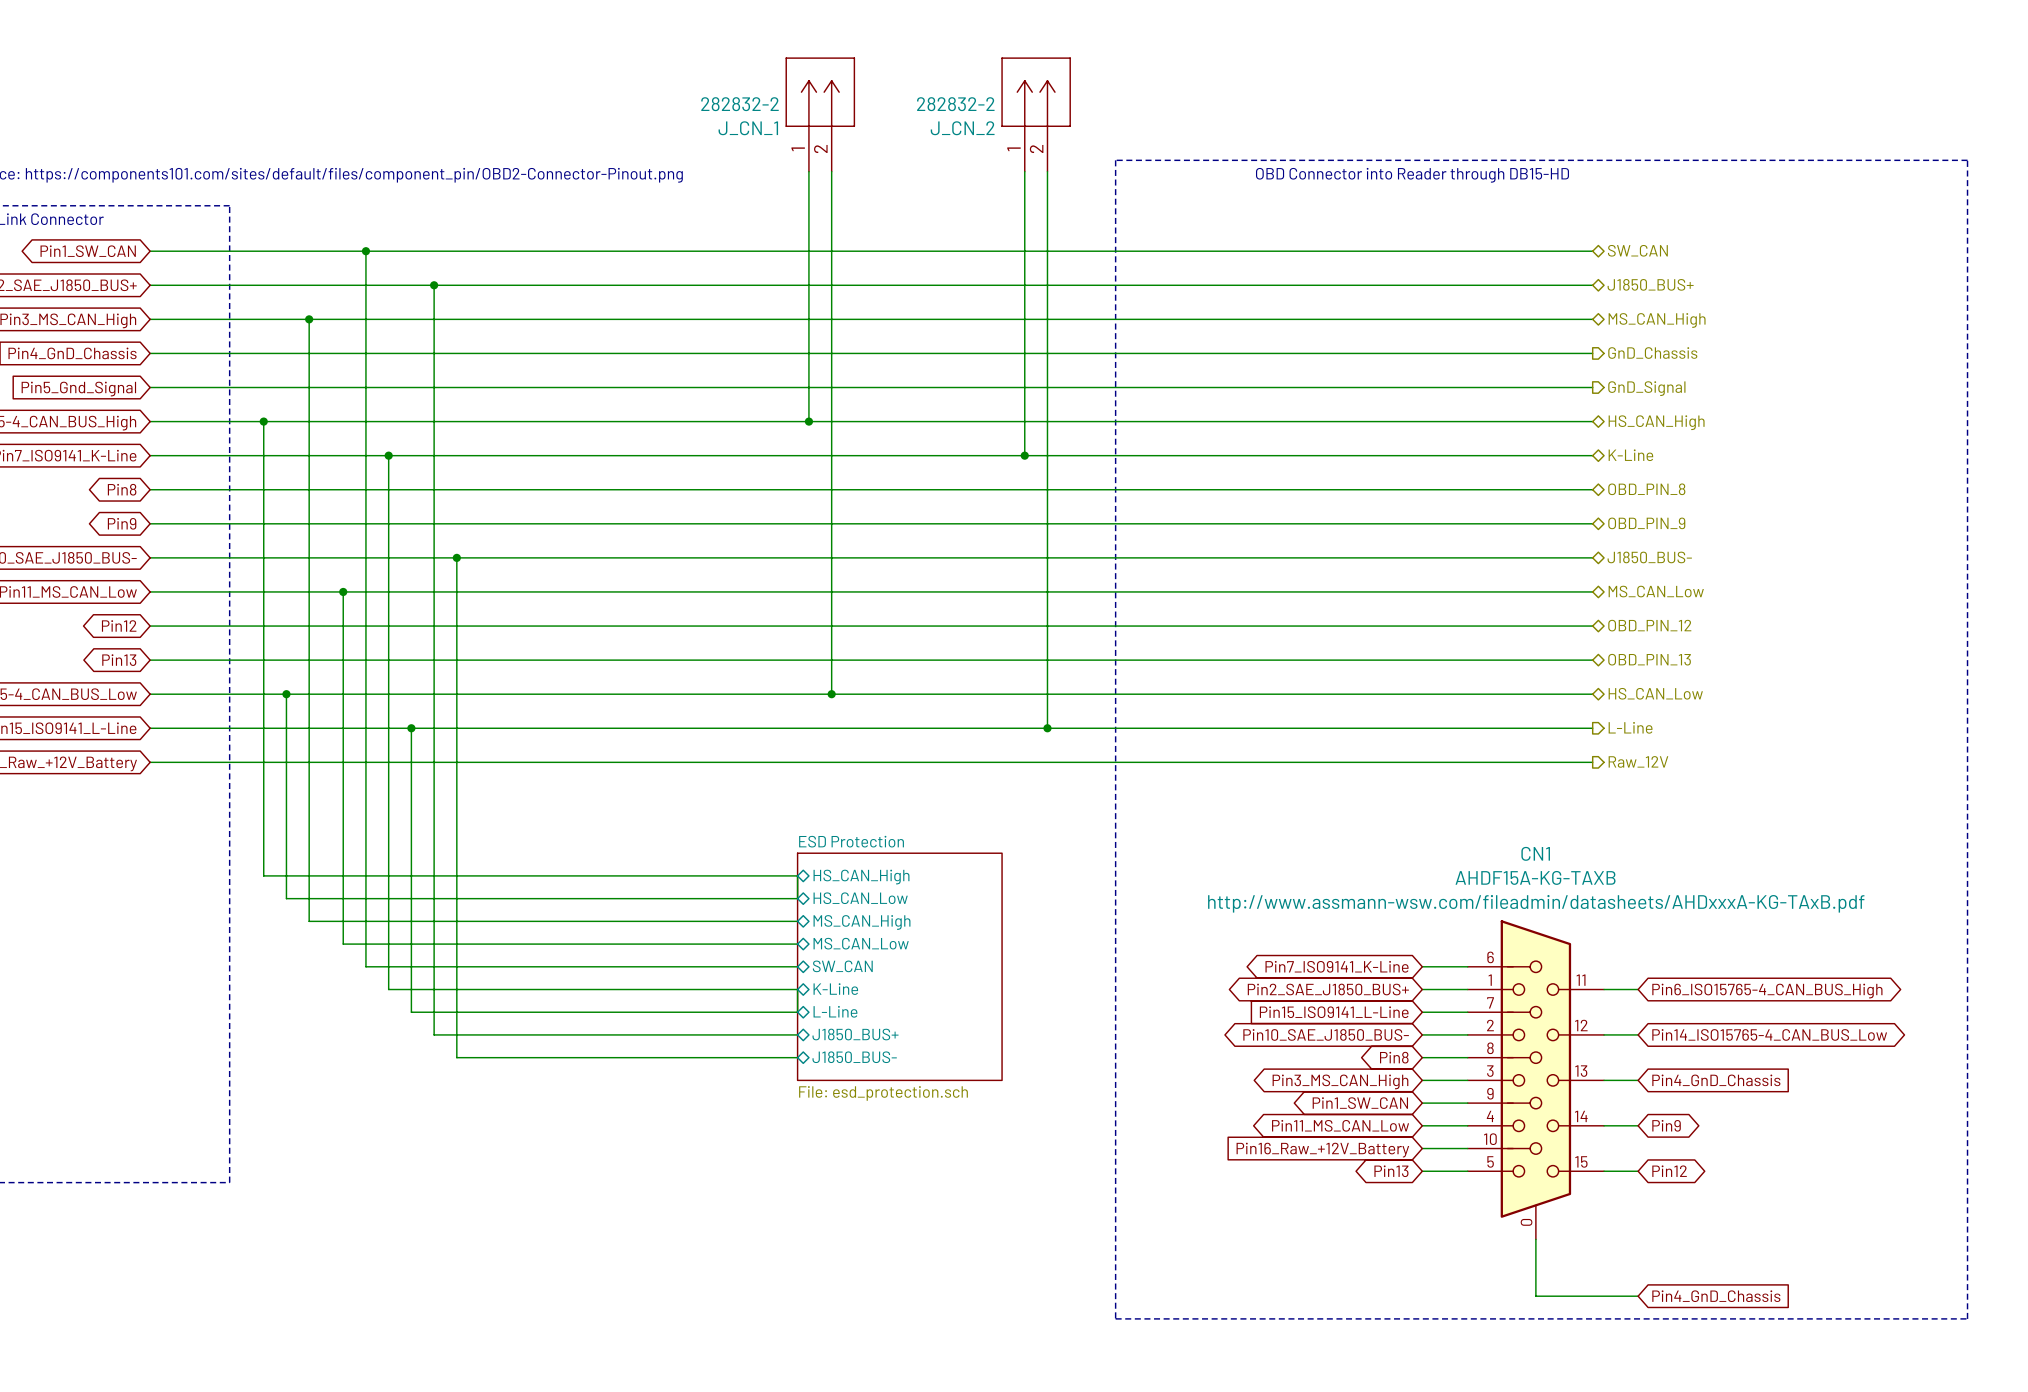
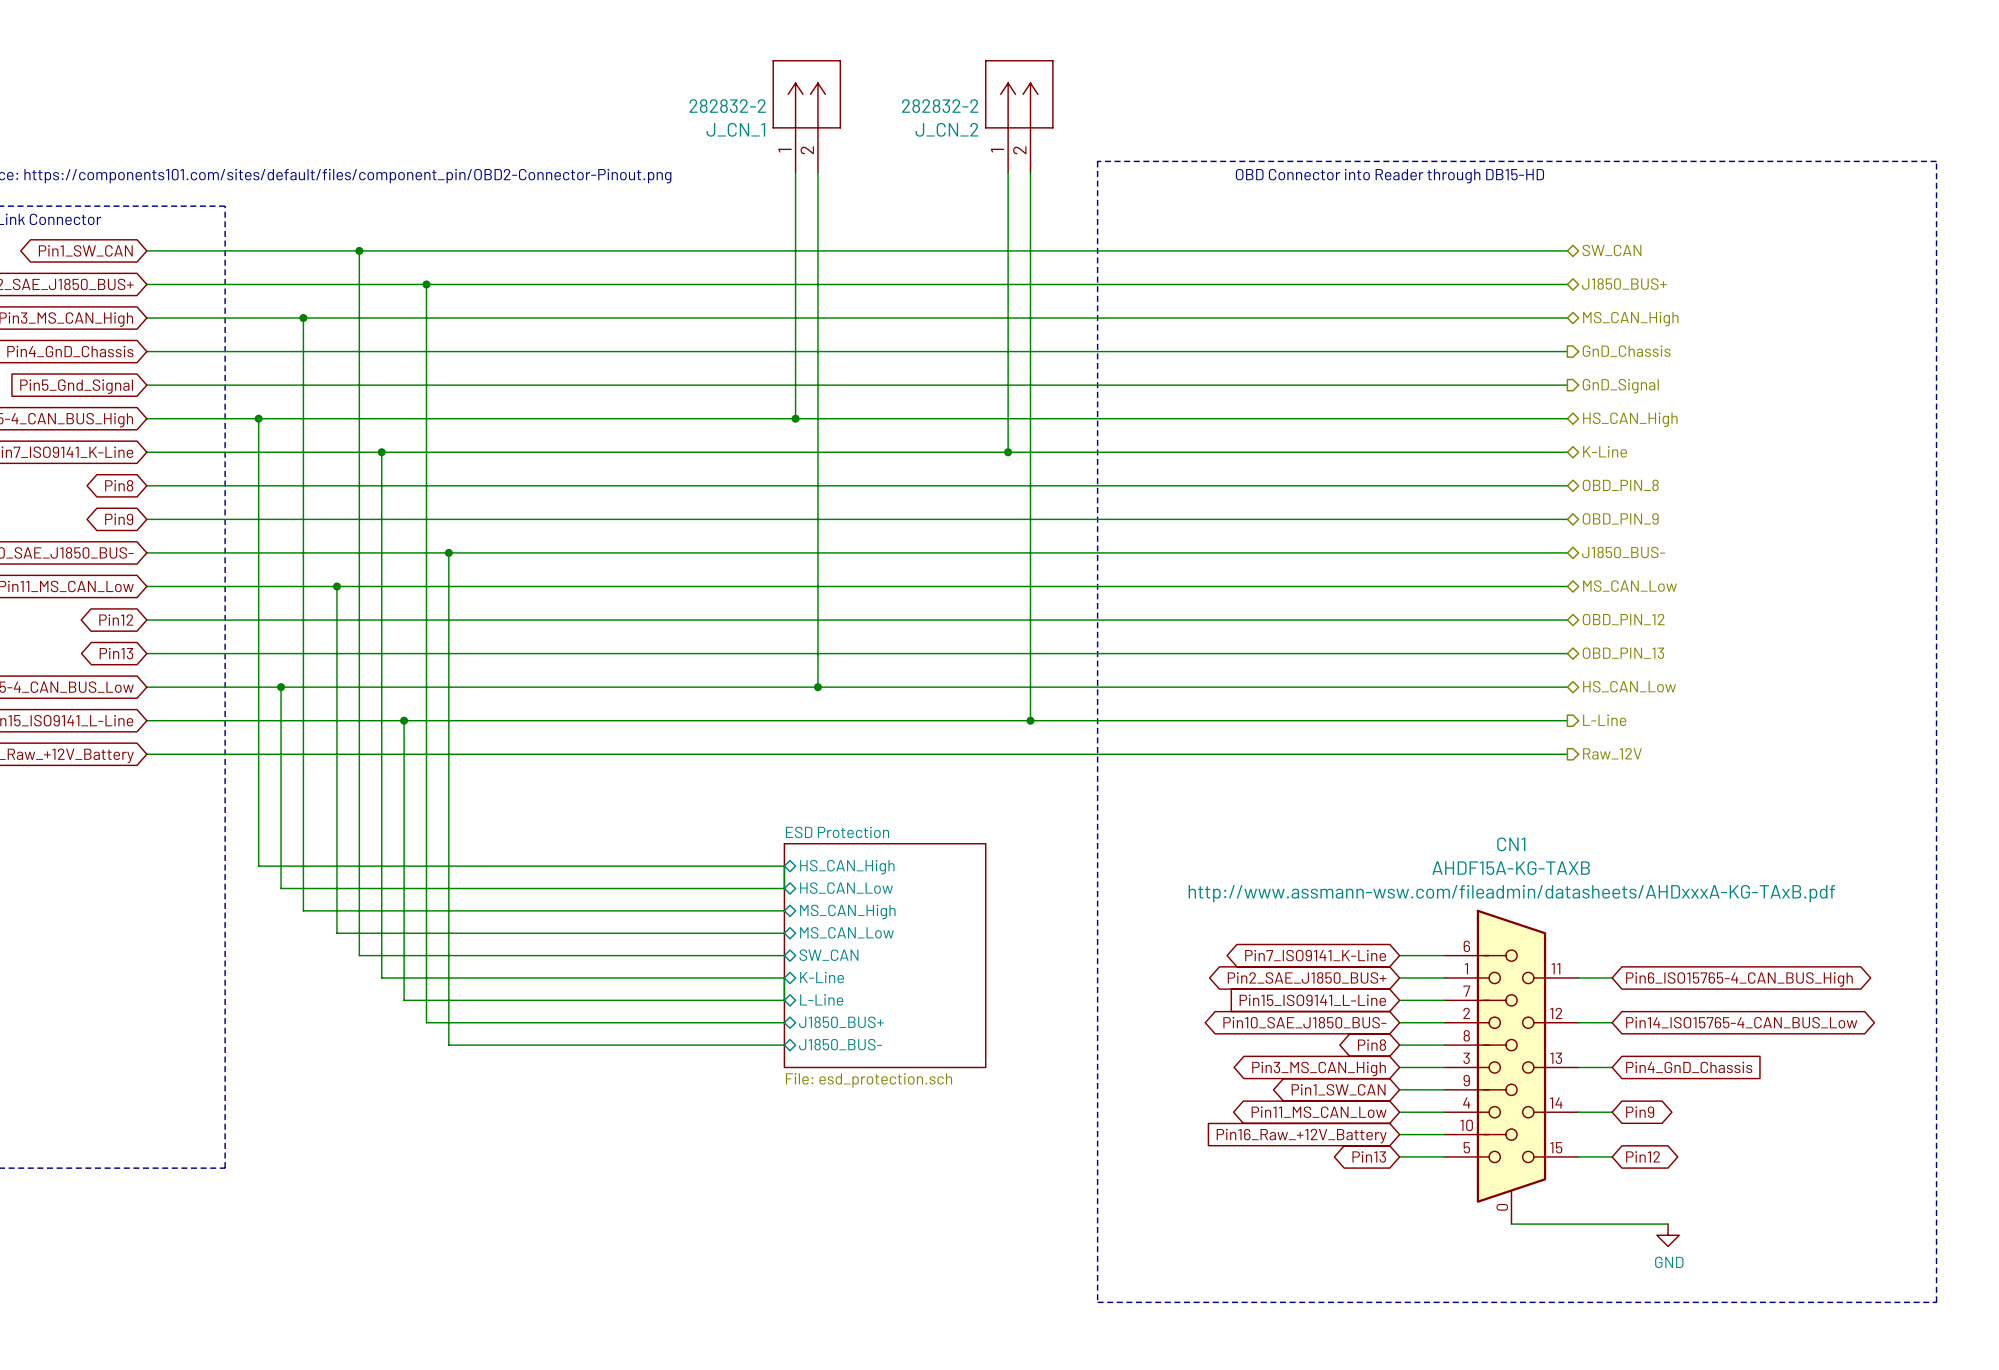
wire: (1535, 1239) (1535, 1296) (1638, 1296) -> (1511, 1224) (1668, 1224)
power symbol: none -> GND (1668, 1235)
global label: Pin4_GnD_Chassis (1716, 1296) -> none

